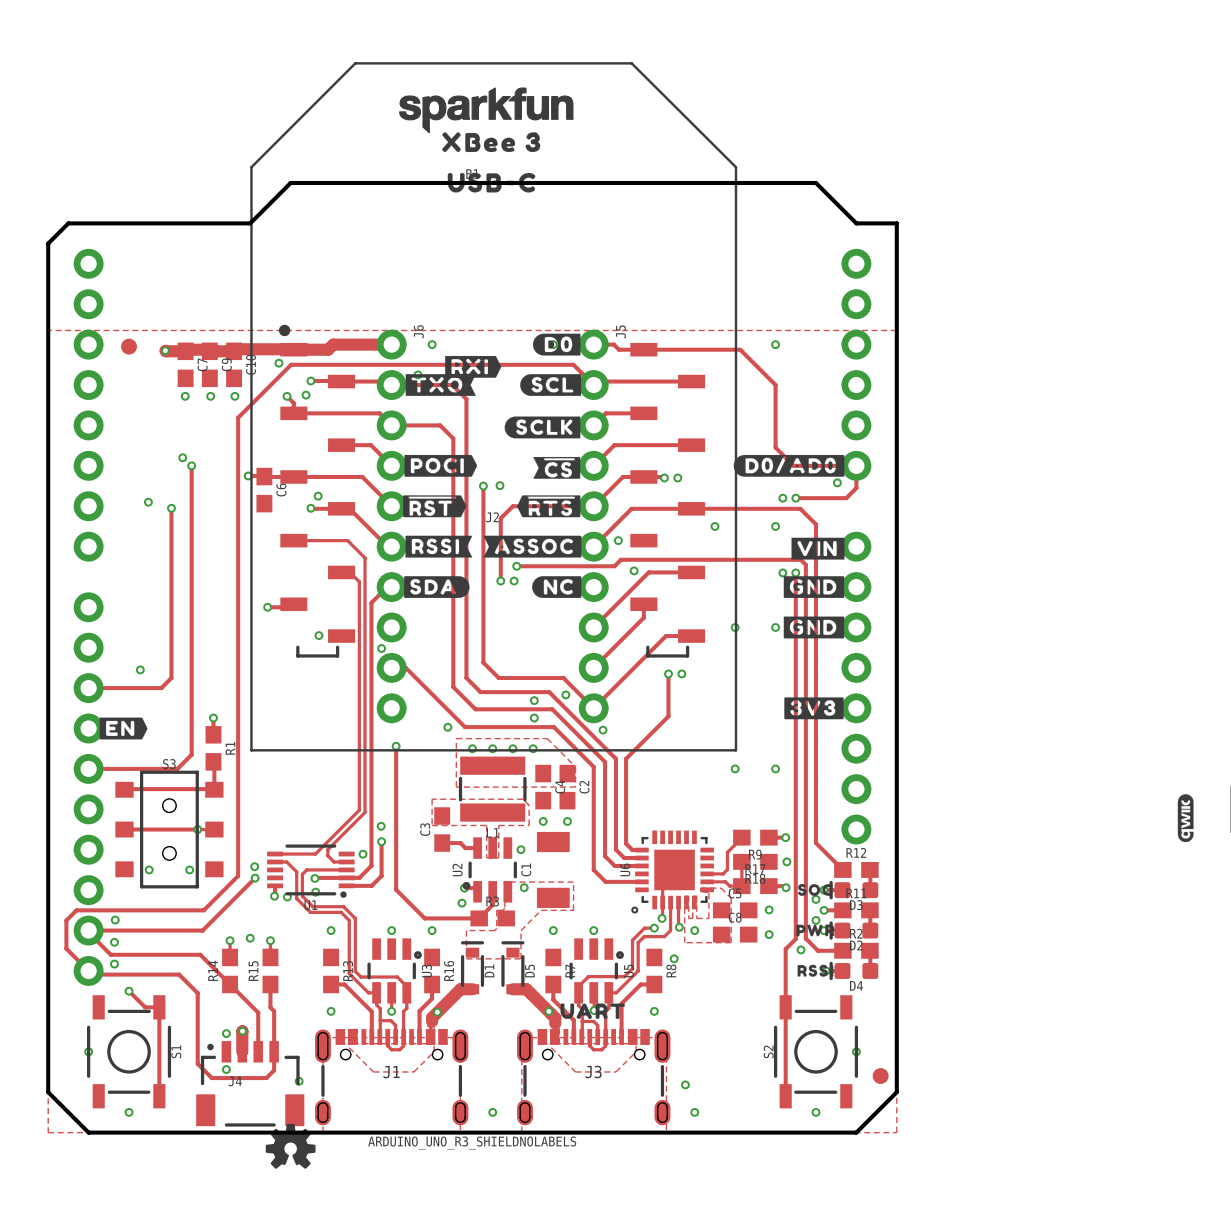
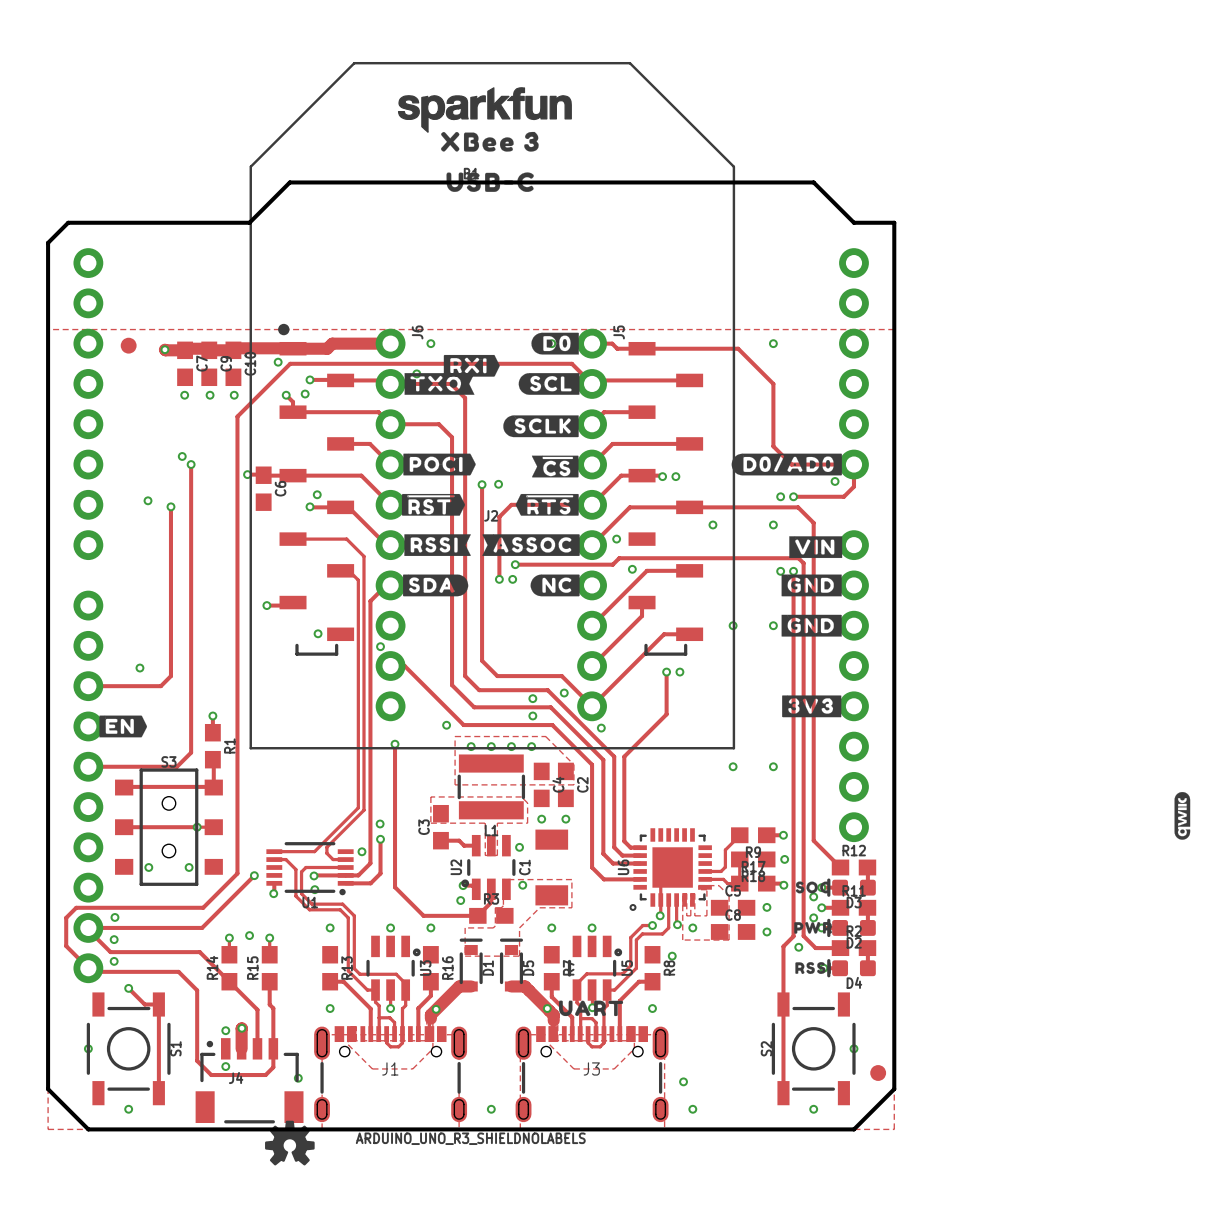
via: (254, 866) -> none
via: (287, 897) -> none

